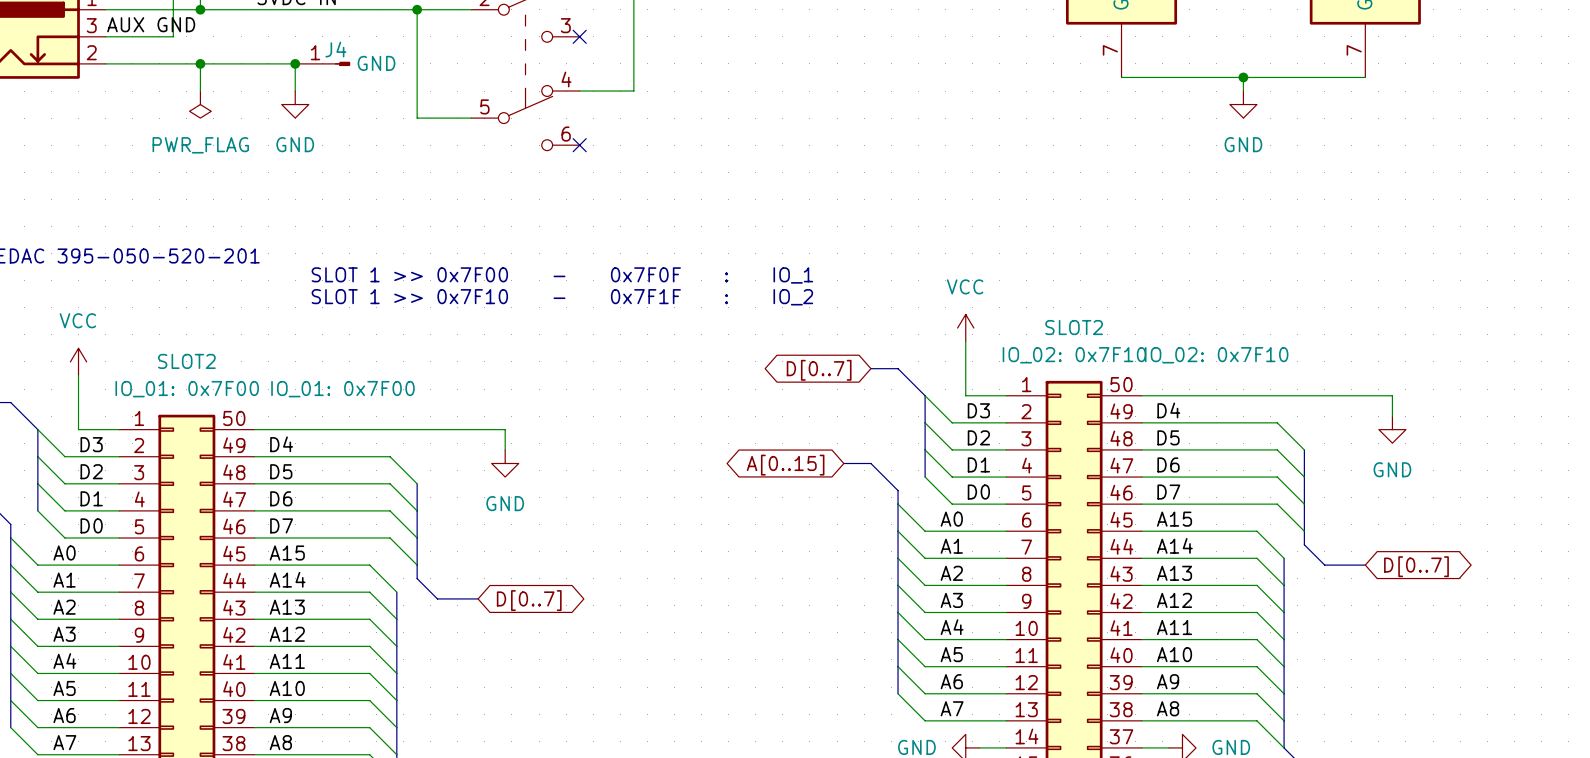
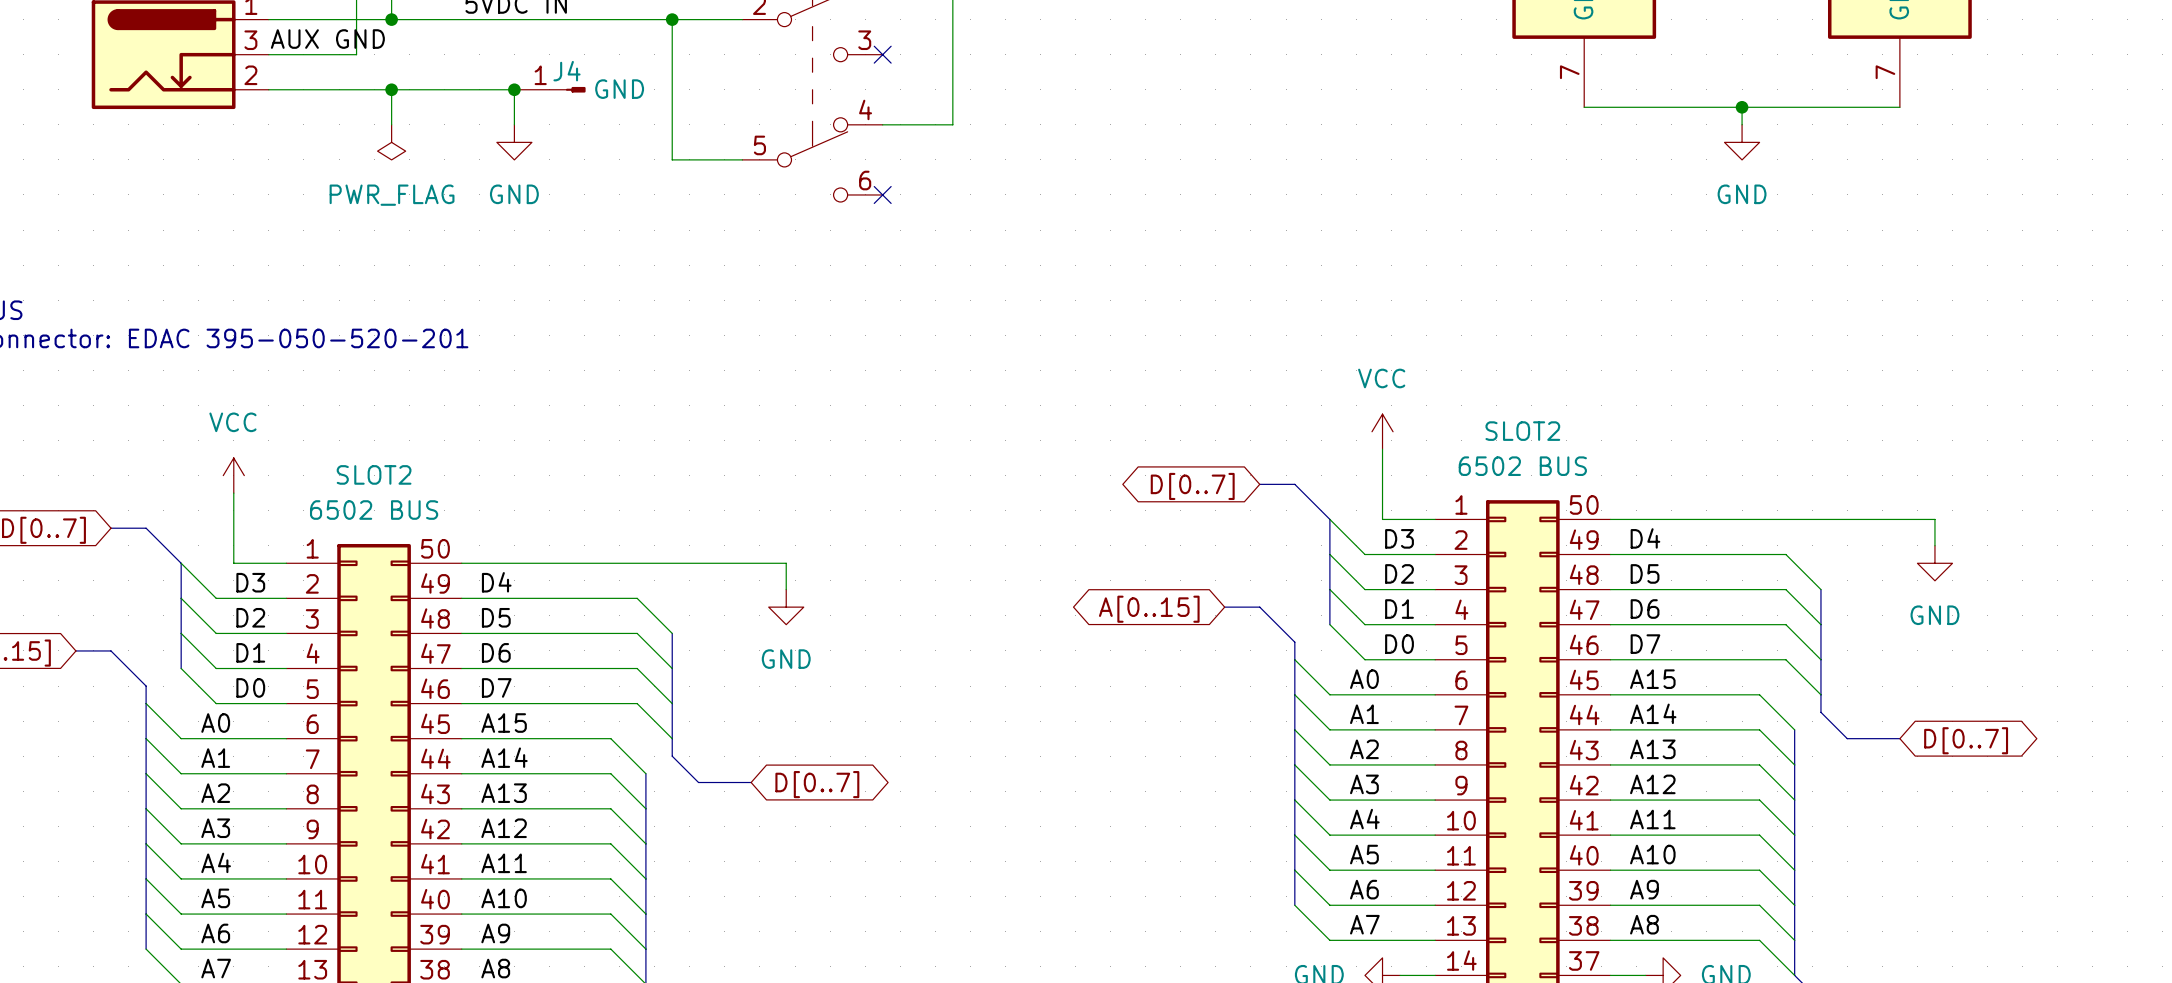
text: SLOT 1 >> 0x7F00 - 0x7F0F : IO_1 (562, 275) -> none
text: SLOT 1 >> 0x7F10 - 0x7F1F : IO_2 (562, 297) -> none
SLOT2 value: IO_02: 0x7F10 (1074, 355) -> 6502 BUS (1522, 466)
SLOT2 text: IO_02: 0x7F10 (1216, 355) -> none
SLOT2 value: IO_01: 0x7F00 (187, 389) -> 6502 BUS (374, 510)
SLOT2 text: IO_01: 0x7F00 (342, 389) -> none

